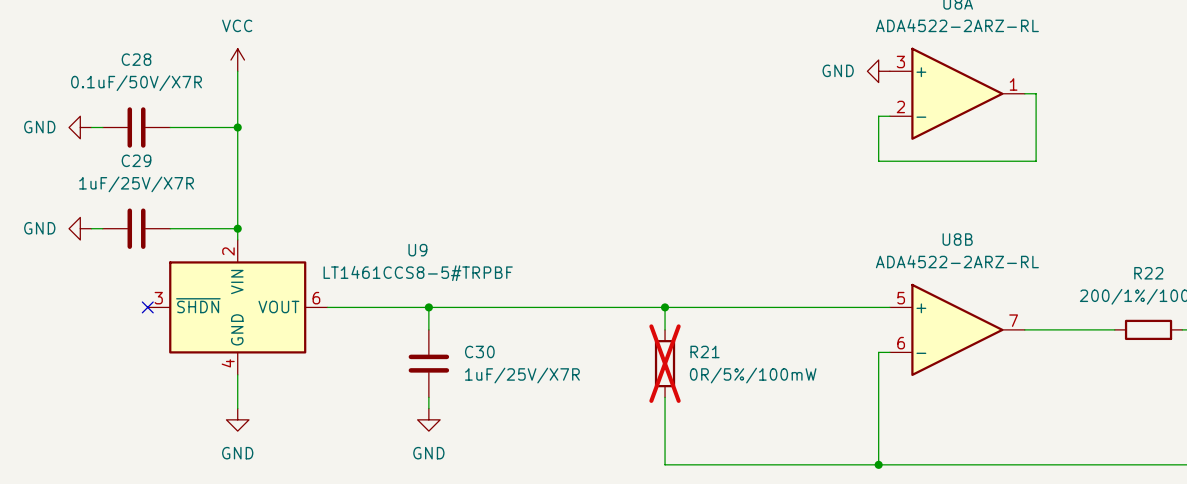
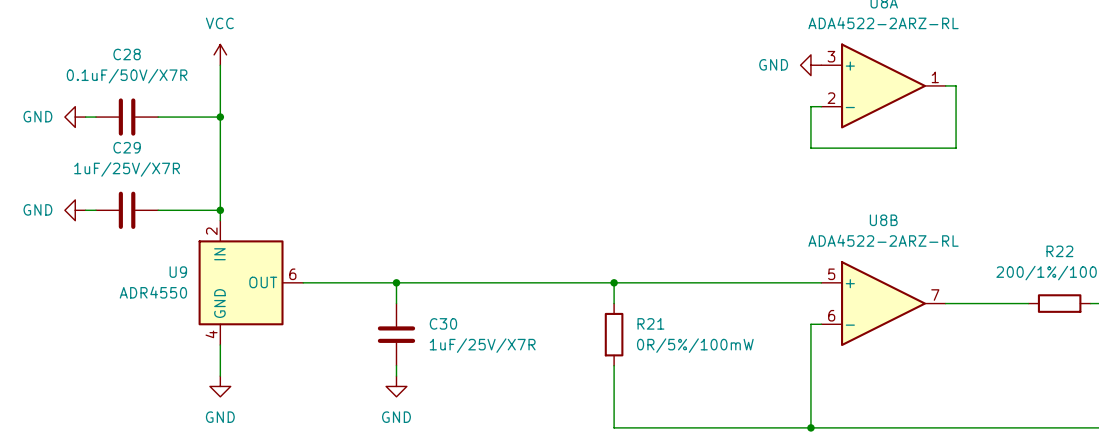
U9 symbol: [147, 239, 328, 375] -> [198, 220, 304, 346]
U9 name position: U9 (417, 250) -> U9 (178, 272)
U9 value: LT1461CCS8-5#TRPBF (418, 273) -> ADR4550 (153, 292)
no-connect mark: (147, 307) -> none
R21 do-not-place cross: (665, 363) -> none

